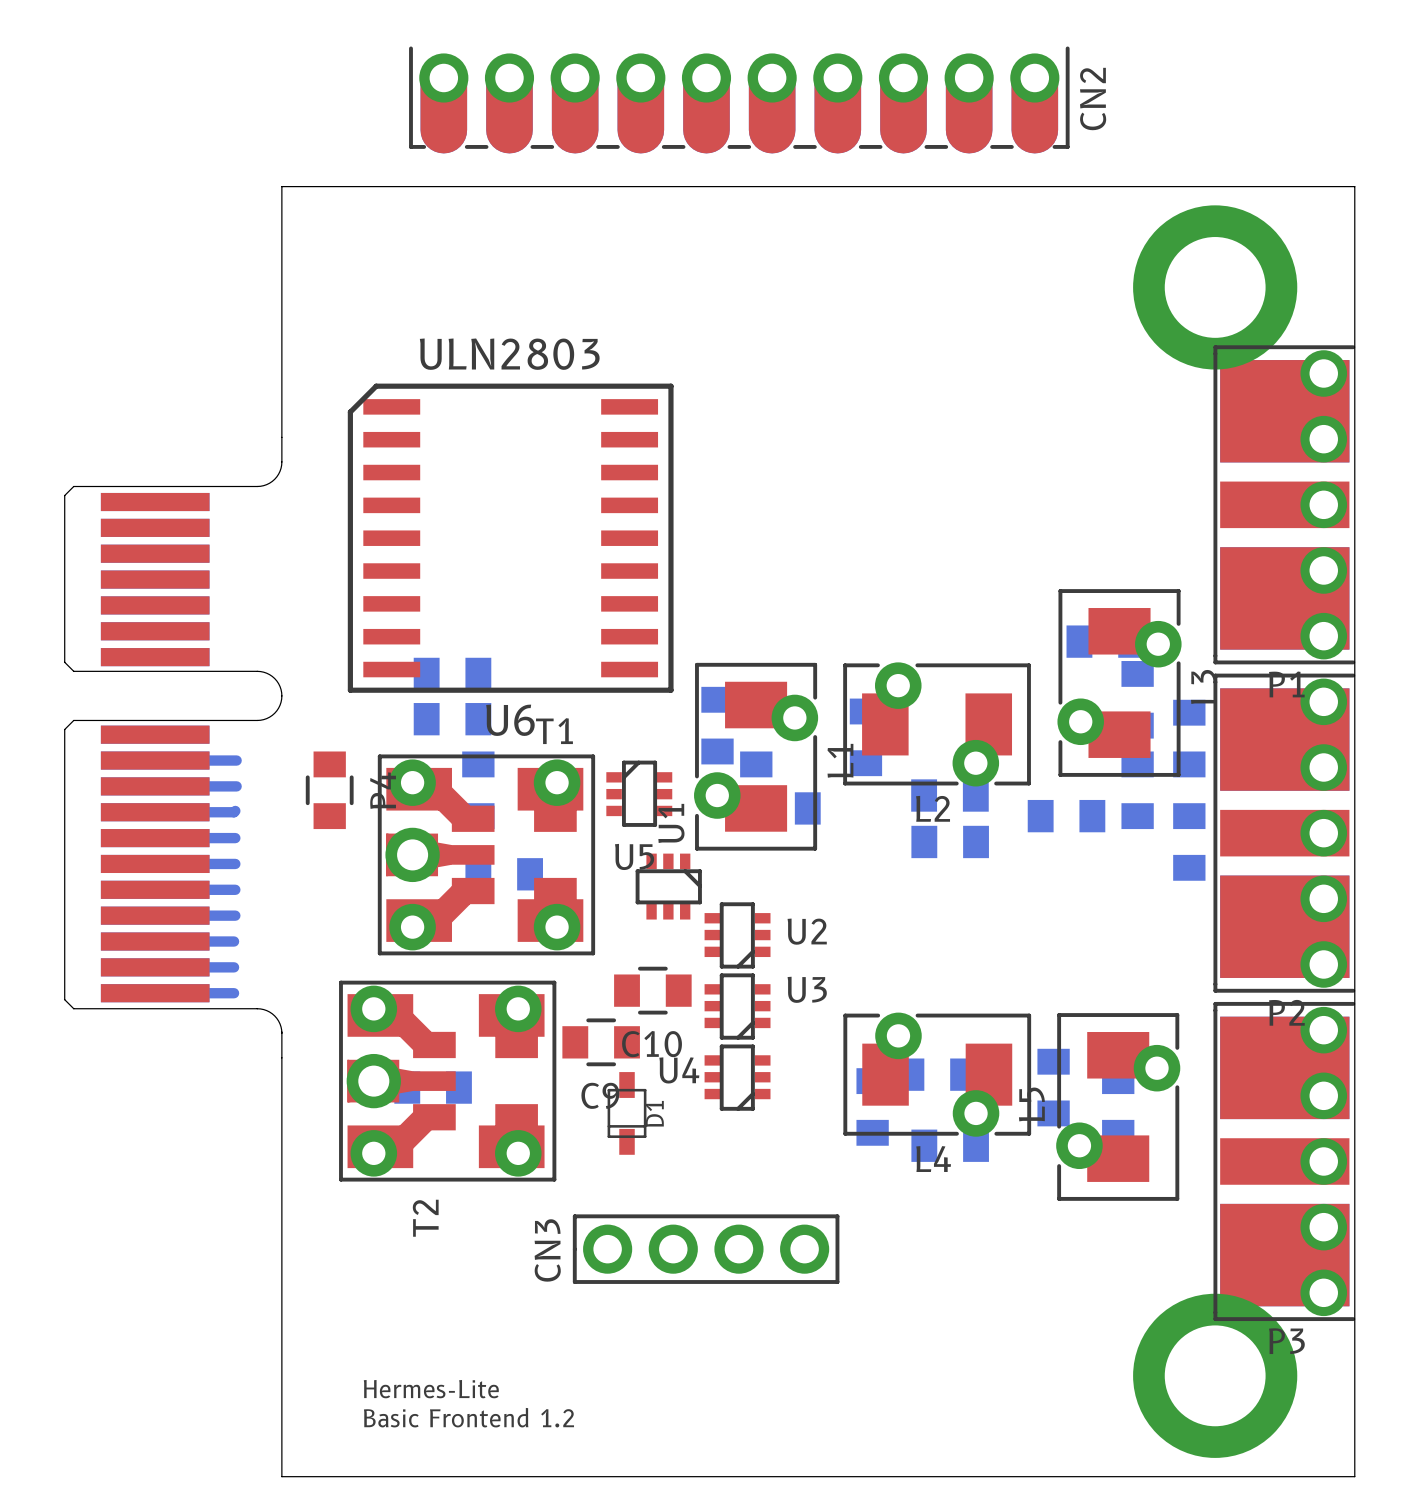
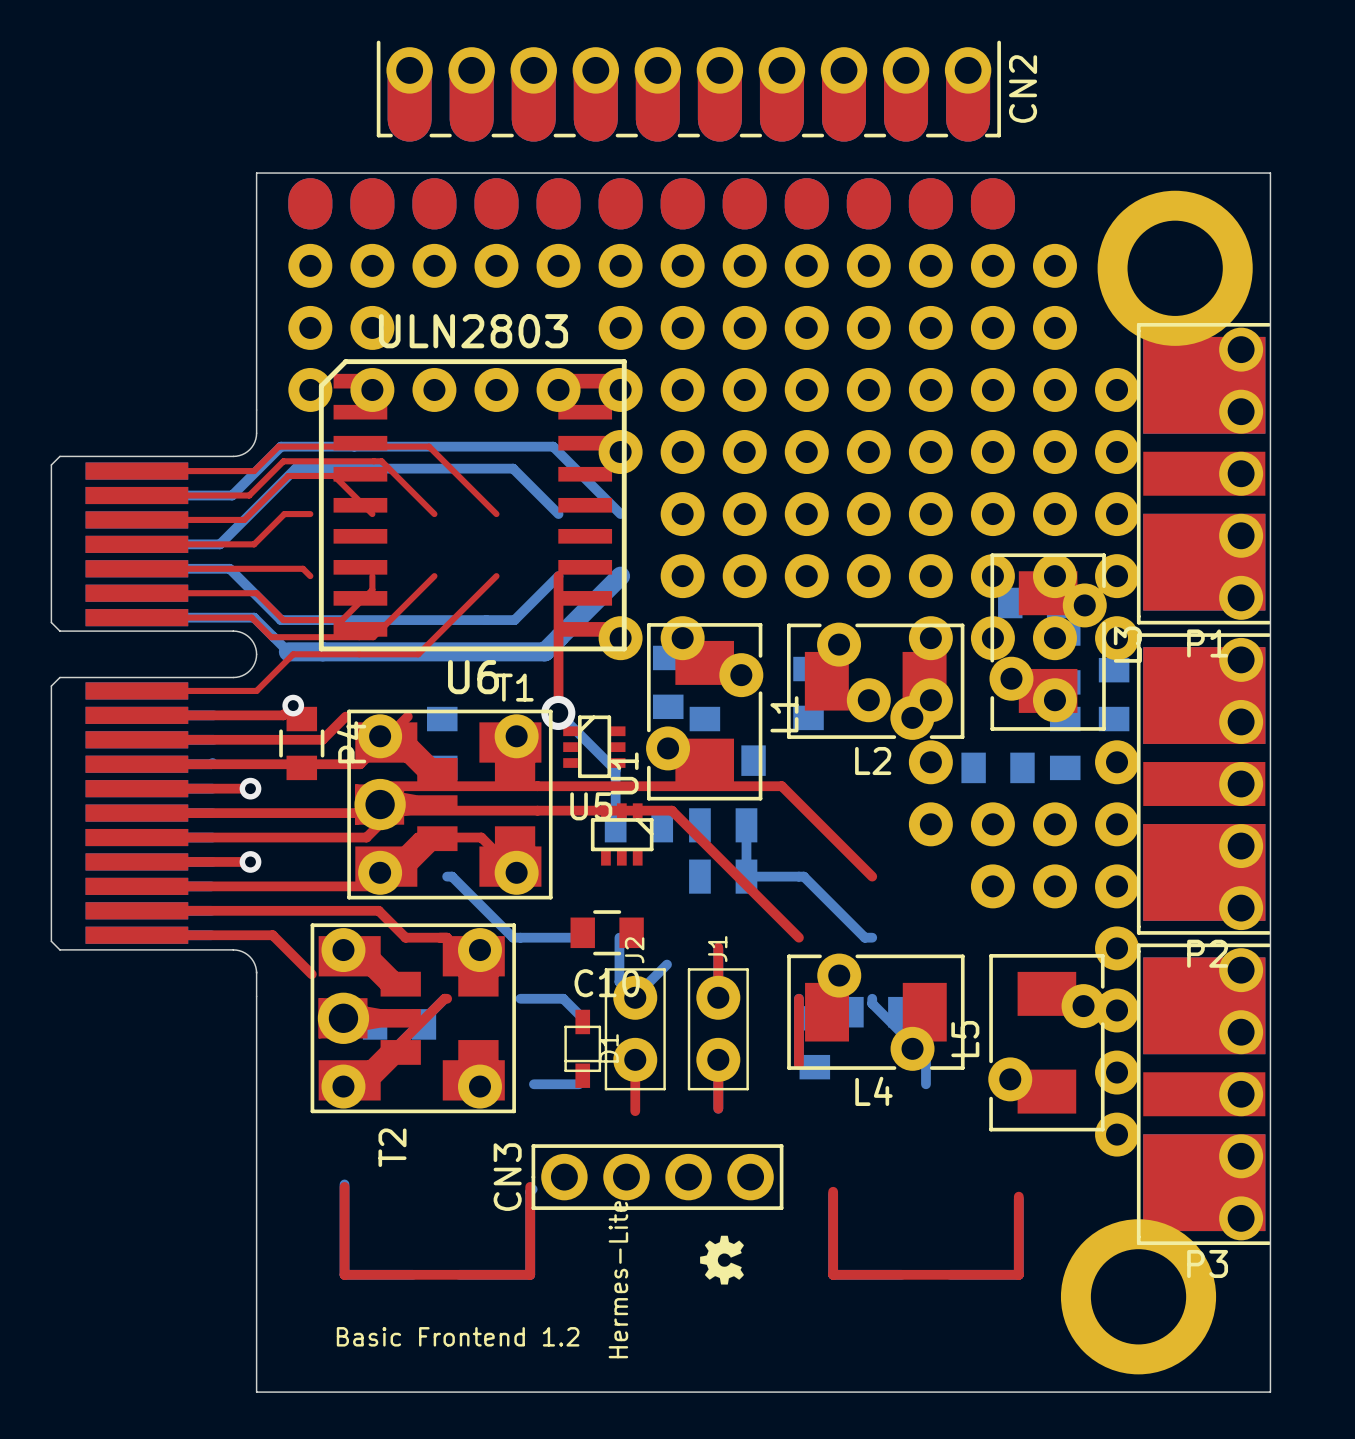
part: none -> (651, 203)
part: none -> (310, 265)
part: none -> (372, 265)
part: none -> (434, 265)
part: none -> (496, 265)
part: none -> (558, 265)
part: none -> (620, 265)
part: none -> (682, 265)
part: none -> (744, 265)
part: none -> (806, 265)
part: none -> (868, 265)
part: none -> (930, 265)
part: none -> (992, 265)
part: none -> (1054, 265)
part position: (1215, 287) -> (1175, 268)
part: none -> (310, 327)
part: none -> (372, 327)
part: none -> (620, 327)
part: none -> (682, 327)
part: none -> (744, 327)
part: none -> (806, 327)
part: none -> (868, 327)
part: none -> (930, 327)
part: none -> (992, 327)
part: none -> (1054, 327)
part: none -> (310, 389)
part: none -> (372, 389)
part: none -> (434, 389)
part: none -> (496, 389)
part: none -> (558, 389)
part: none -> (620, 389)
part: none -> (682, 389)
part: none -> (744, 389)
part: none -> (806, 389)
part: none -> (868, 389)
part: none -> (930, 389)
part: none -> (992, 389)
part: none -> (1054, 389)
part: none -> (1117, 389)
part: none -> (620, 452)
part: none -> (682, 452)
part: none -> (744, 452)
part: none -> (806, 452)
part: none -> (868, 452)
part: none -> (930, 452)
part: none -> (992, 452)
part: none -> (1054, 452)
part: none -> (1117, 452)
top track: none -> (136, 471) (254, 471) (278, 446) (429, 446) (496, 514)
bottom track: none -> (136, 495) (232, 495) (281, 446) (553, 446) (620, 514)
top track: none -> (136, 495) (249, 495) (283, 461) (381, 461) (434, 514)
top track: none -> (310, 514) (284, 514) (254, 544) (136, 544)
top track: none -> (372, 514) (334, 475) (288, 475) (244, 519) (136, 519)
bottom track: none -> (558, 514) (513, 468) (295, 468) (219, 544) (136, 544)
part: none -> (682, 514)
part: none -> (744, 514)
part: none -> (806, 514)
part: none -> (868, 514)
part: none -> (930, 514)
part: none -> (992, 514)
part: none -> (1054, 514)
part: none -> (1117, 514)
bottom track: none -> (136, 568) (229, 568) (281, 620) (514, 620) (558, 576)
top track: none -> (136, 568) (303, 568) (310, 576)
top track: none -> (372, 576) (372, 589) (342, 620) (283, 620) (256, 593) (136, 593)
top track: none -> (434, 576) (373, 637) (271, 637) (251, 617) (136, 617)
top track: none -> (496, 576) (418, 654) (293, 654) (256, 690) (136, 690)
top track: none -> (558, 576) (558, 712)
bottom track: none -> (620, 576) (544, 651) (288, 651) (254, 617) (136, 617)
part: none -> (682, 576)
part: none -> (744, 576)
part: none -> (806, 576)
part: none -> (868, 576)
part: none -> (930, 576)
part: none -> (992, 576)
part: none -> (1054, 576)
part: none -> (1117, 576)
part: (452, 673) -> none
part: none -> (620, 638)
part: none -> (682, 638)
part: none -> (930, 638)
part: none -> (992, 638)
part: none -> (1054, 638)
part: none -> (1117, 638)
part: (452, 719) -> none
part: none -> (868, 700)
part: none -> (930, 700)
part: none -> (1054, 700)
top track: none -> (293, 705) (283, 715) (136, 715)
via: none -> (293, 705)
bottom track: none -> (558, 712) (615, 770) (615, 825)
via: none -> (558, 712)
top track: none -> (345, 716) (322, 739) (136, 739)
top track: none -> (407, 716) (360, 764) (136, 764)
part: (949, 795) -> none
part: none -> (930, 762)
part: none -> (1117, 762)
top track: none -> (136, 788) (250, 788)
via: none -> (250, 788)
part: (950, 841) -> none
part: (1189, 841) -> none
top track: none -> (136, 813) (356, 813) (383, 786) (781, 786) (872, 876)
part: (504, 874) -> none
part: none -> (930, 824)
part: none -> (992, 824)
part: none -> (1054, 824)
part: none -> (1117, 824)
part: none -> (638, 825)
part: none -> (723, 825)
bottom track: none -> (746, 825) (746, 876) (803, 876) (864, 937) (872, 937)
top track: none -> (136, 837) (366, 837) (393, 810) (671, 810) (798, 937)
top track: none -> (136, 861) (250, 861)
via: none -> (250, 861)
bottom track: none -> (447, 876) (452, 876) (513, 937) (572, 937)
top track: none -> (520, 876) (481, 837) (417, 837) (368, 886) (136, 886)
part: none -> (723, 876)
U2: (737, 935) -> none
part: none -> (992, 886)
part: none -> (1054, 886)
part: none -> (1117, 886)
top track: none -> (136, 910) (378, 910) (405, 937) (447, 937)
top track: none -> (136, 935) (272, 935) (311, 974)
bottom track: none -> (619, 937) (619, 981) (635, 997) (667, 964)
U3: (737, 1006) -> none
top track: none -> (718, 947) (718, 997)
part: none -> (1117, 948)
C9: (601, 1042) -> none
top track: none -> (447, 998) (444, 998) (373, 1069)
bottom track: none -> (520, 998) (563, 998) (579, 1014)
top track: none -> (798, 998) (798, 1064)
bottom track: none -> (872, 998) (872, 1003) (925, 1057) (925, 1084)
part: none -> (1117, 1010)
U4: (737, 1077) -> none
part: (1053, 1087) -> none
J2: none -> (635, 1029)
J1: none -> (718, 1029)
part: (1118, 1106) -> none
top track: none -> (635, 1059) (635, 1111)
top track: none -> (718, 1059) (718, 1108)
part: none -> (1117, 1072)
part: (950, 1145) -> none
bottom track: none -> (533, 1084) (579, 1084)
part: none -> (1117, 1134)
top track: none -> (344, 1186) (344, 1274) (530, 1274) (530, 1186)
top track: none -> (833, 1191) (833, 1274) (1018, 1274) (1018, 1196)
drawing: none -> [700, 1235, 744, 1285]
text rotation: 0° (431, 1389) -> 90° counterclockwise (618, 1279)

